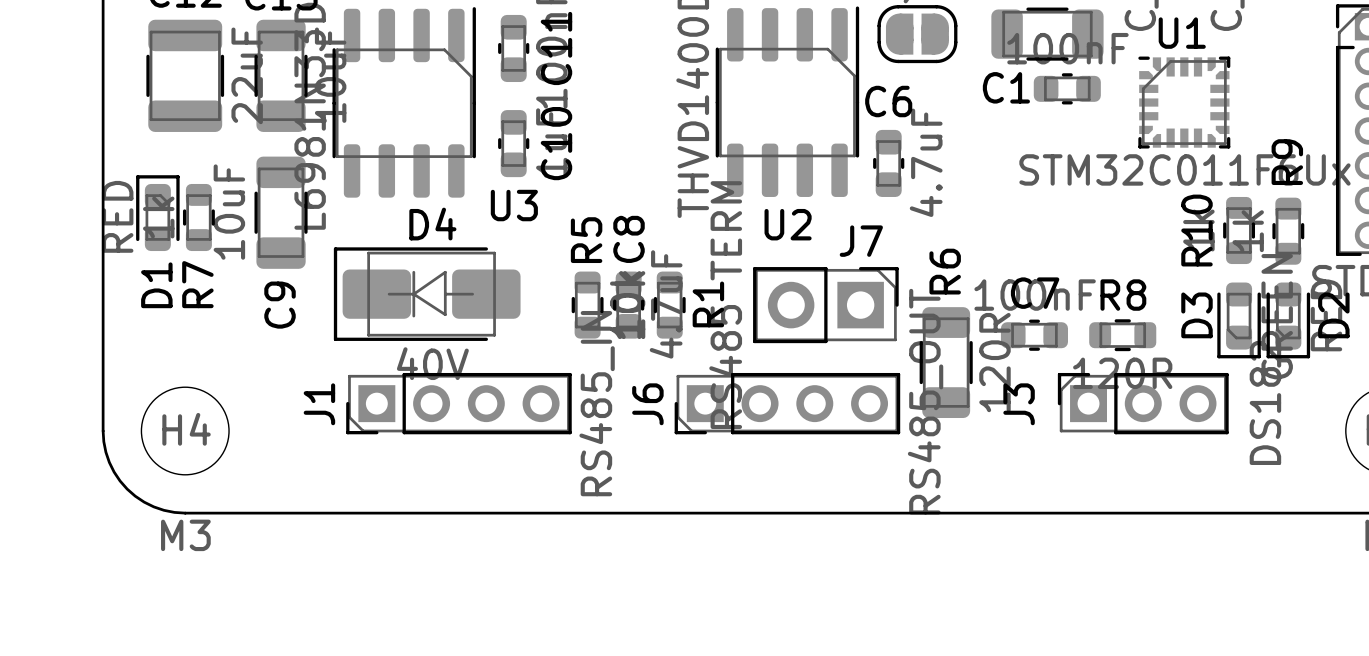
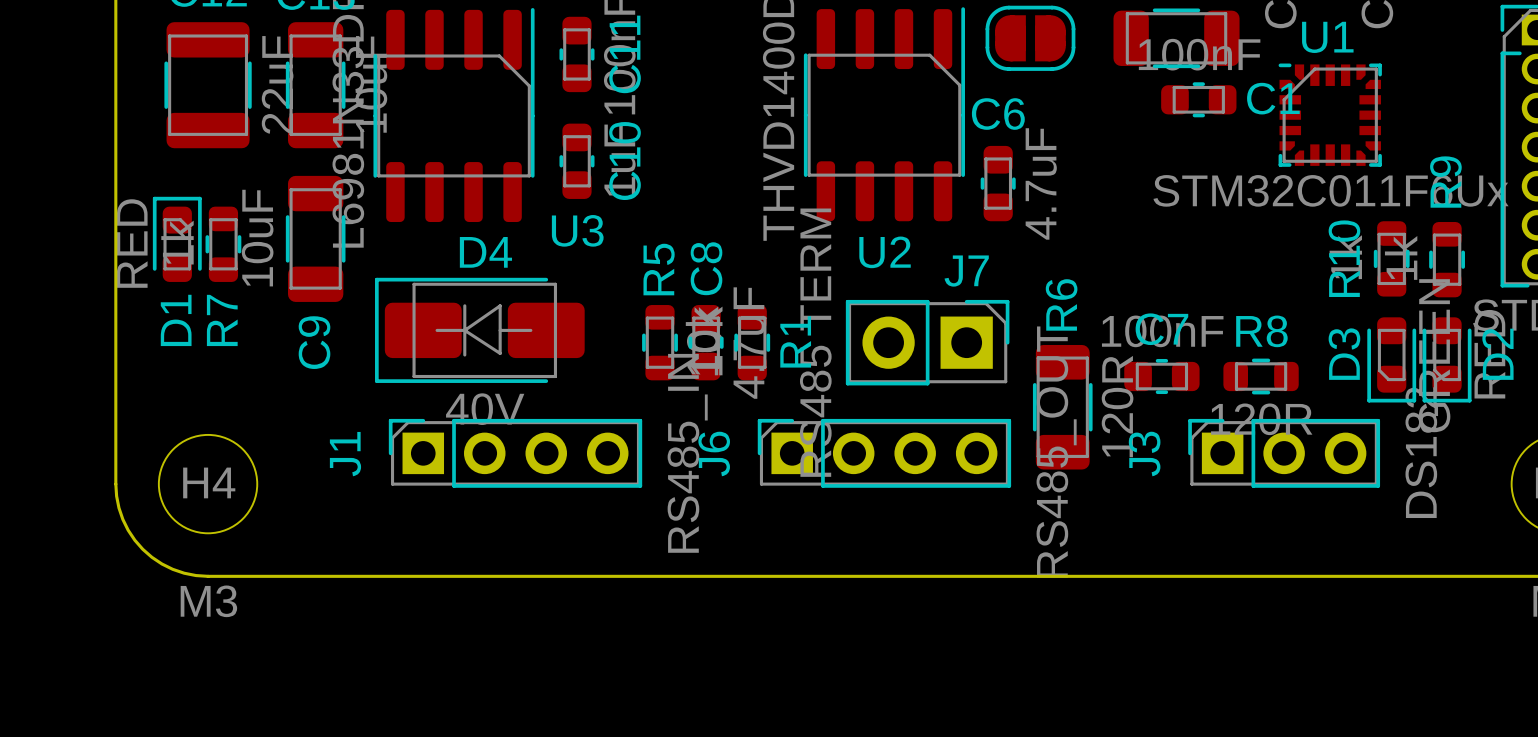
C1 name position: C1 (1006, 87) -> C1 (1273, 98)
J1 footprint: [346, 372, 572, 435] -> [388, 418, 643, 488]
J6 footprint: [674, 372, 901, 435] -> [757, 418, 1012, 488]

